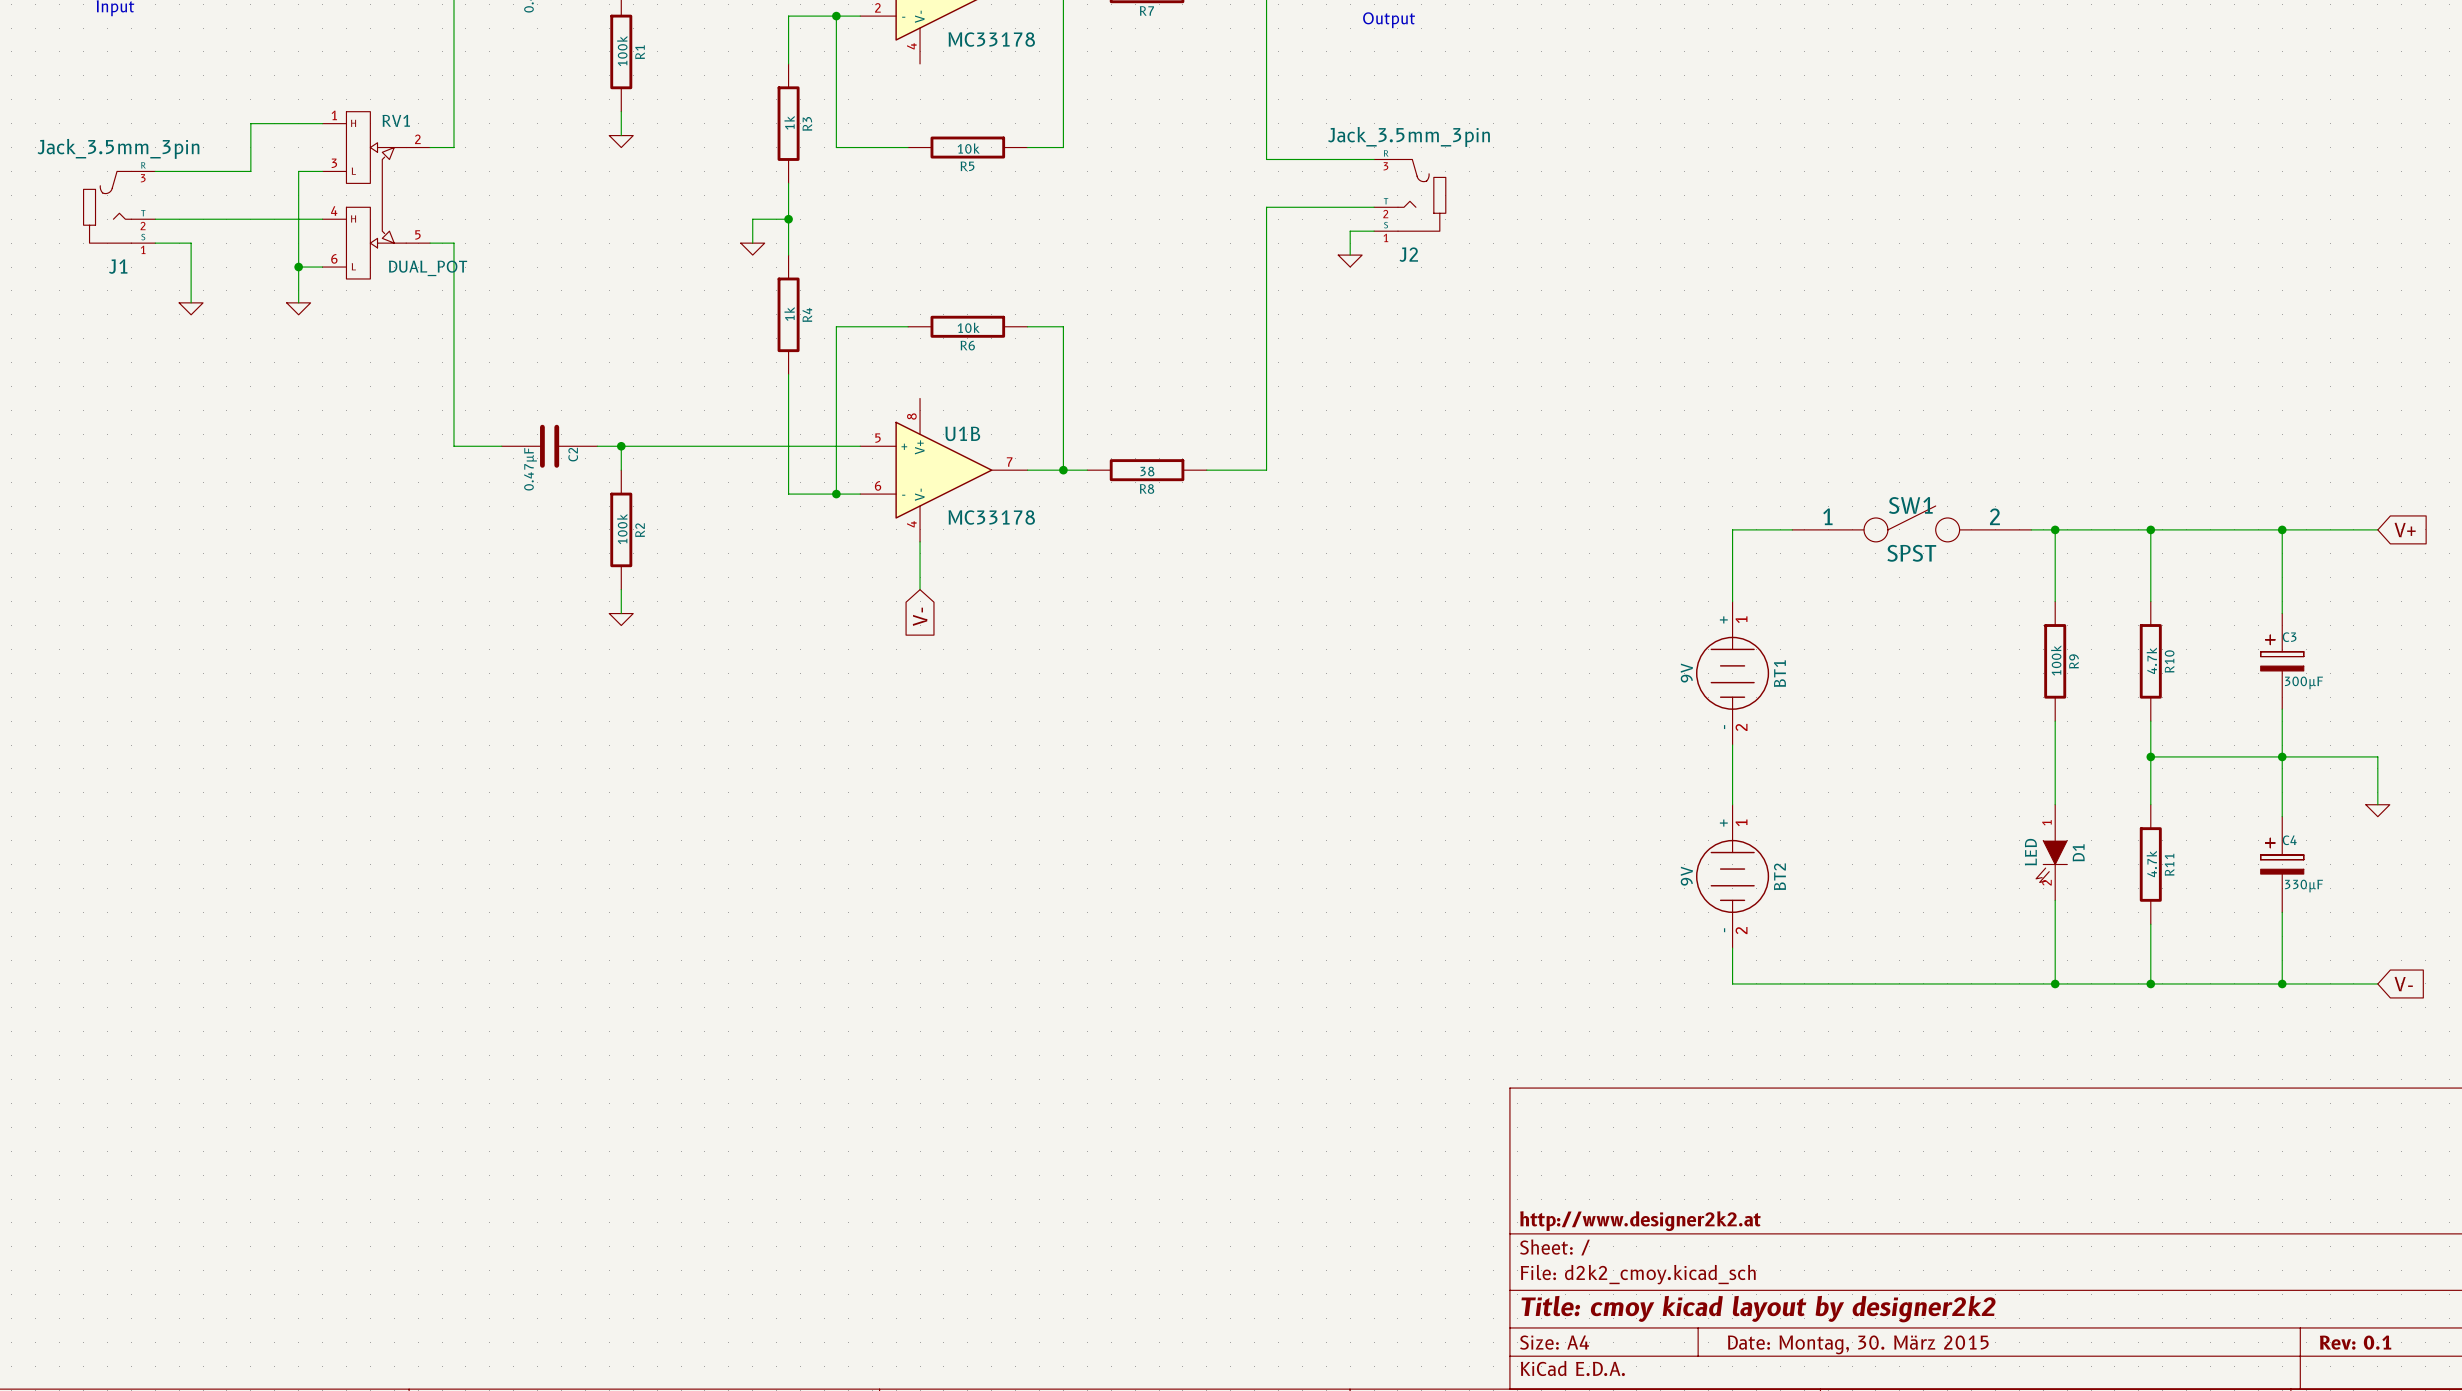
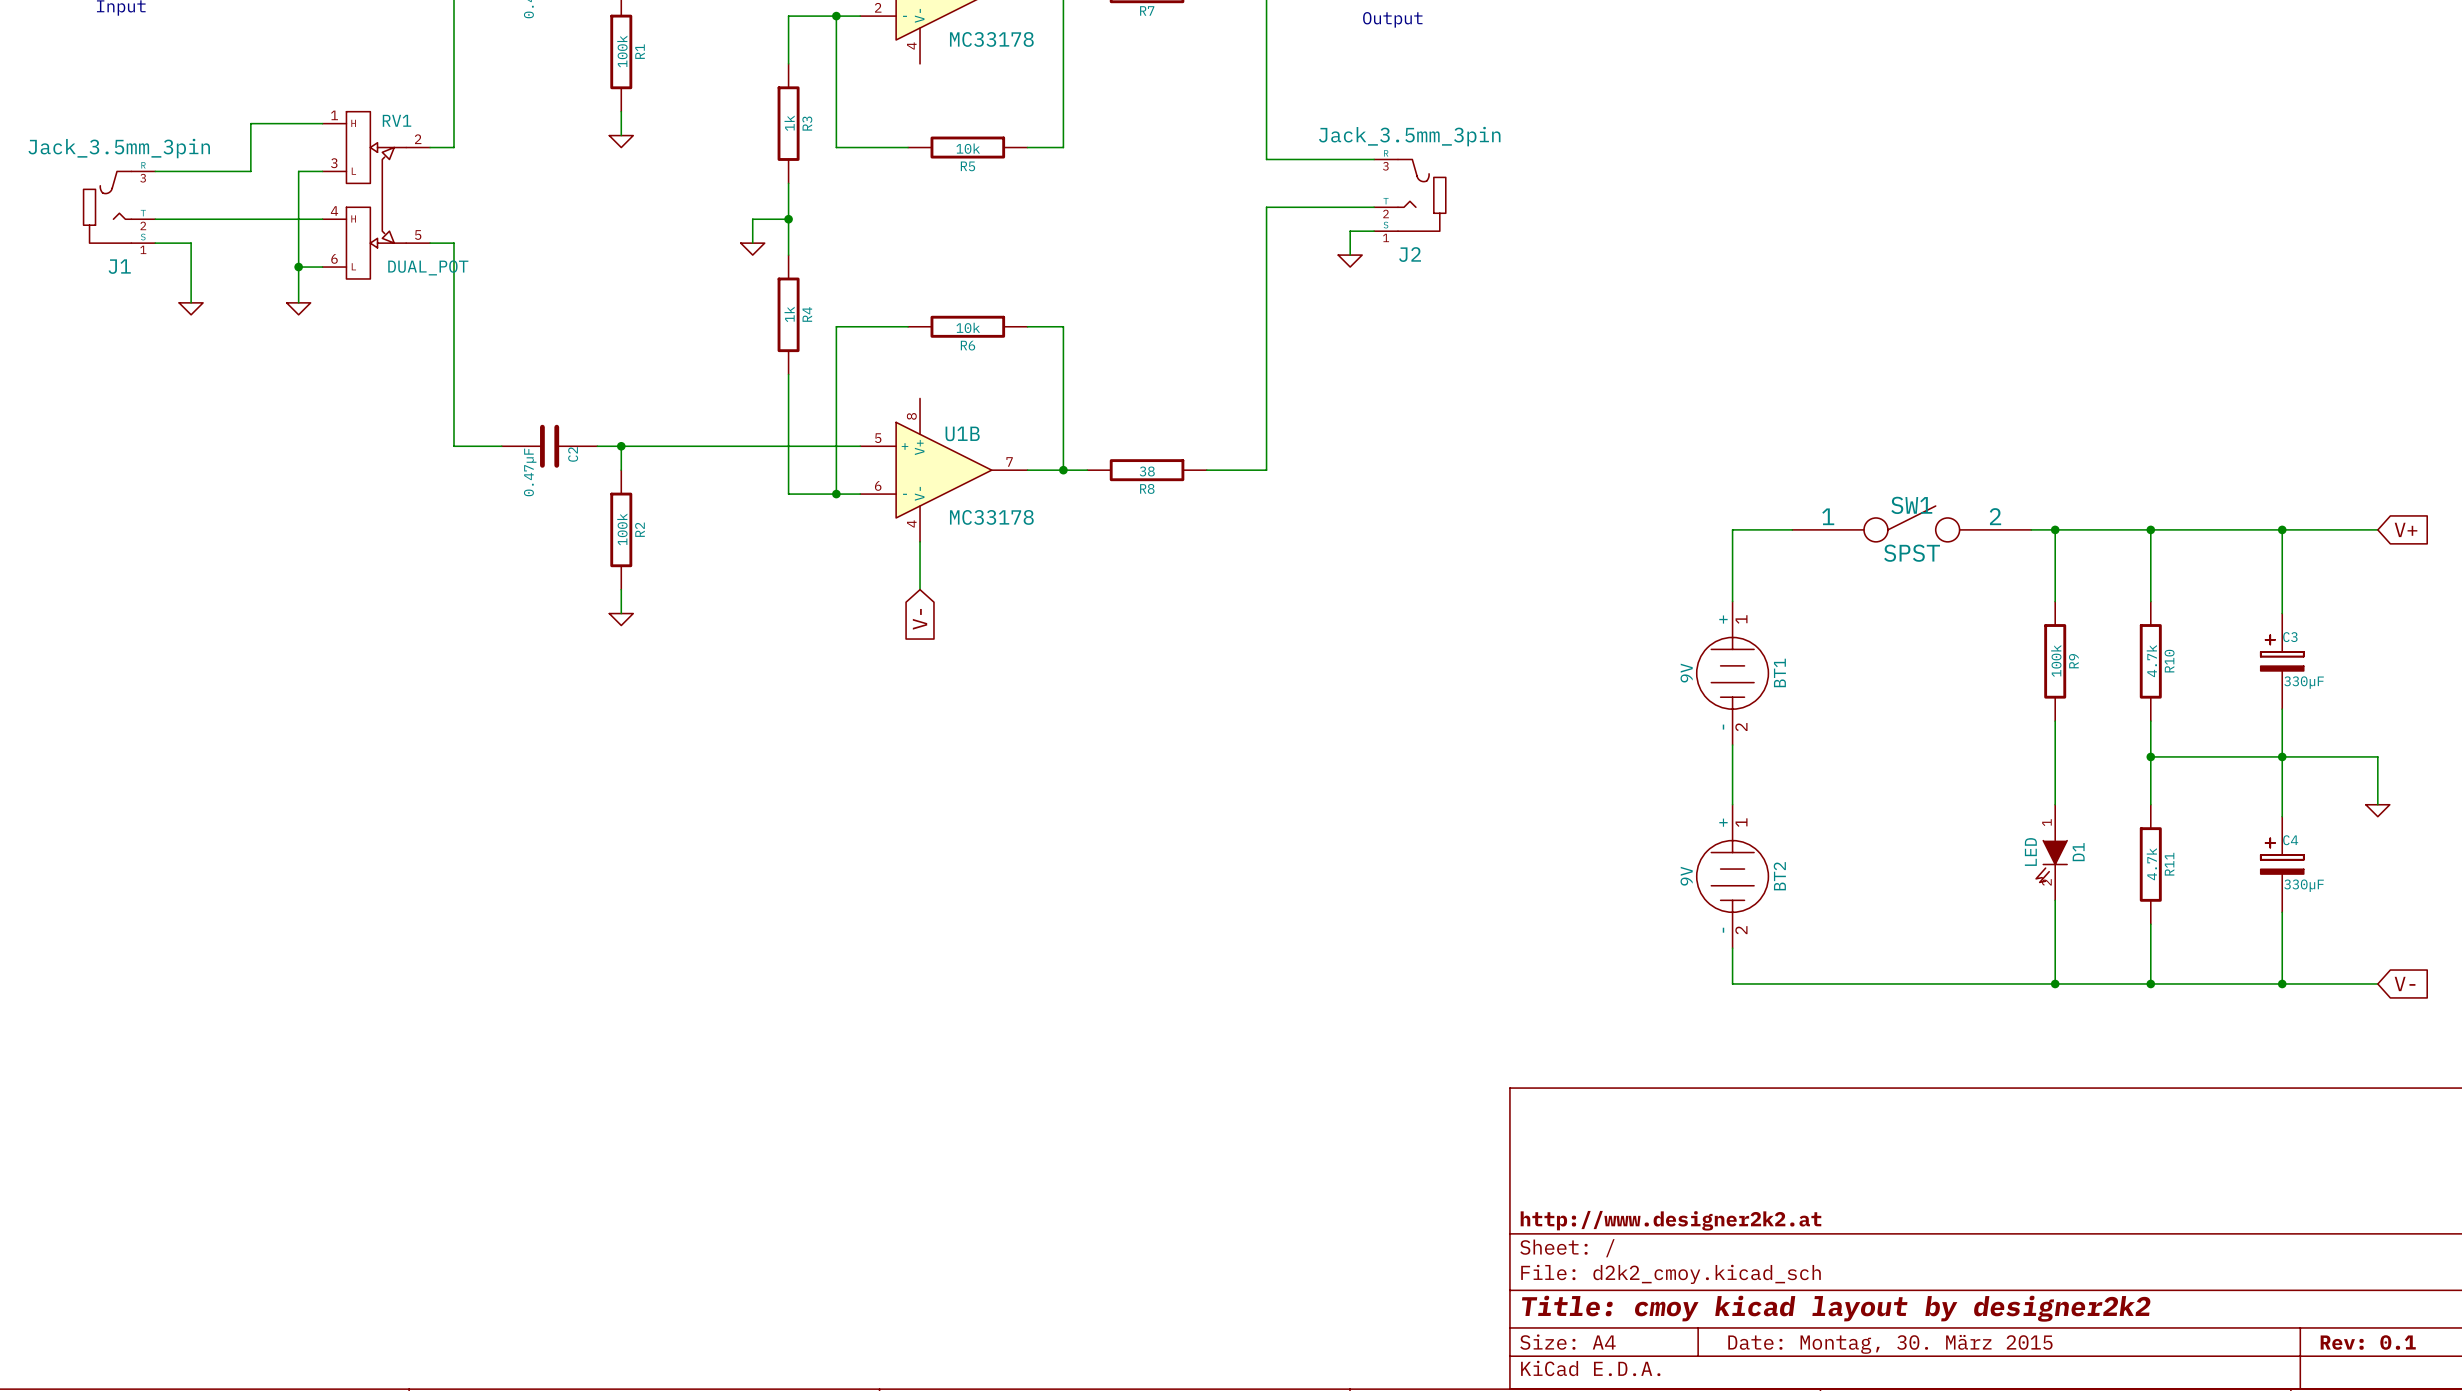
C3 value: 300µF (2303, 682) -> 330µF (2304, 682)

